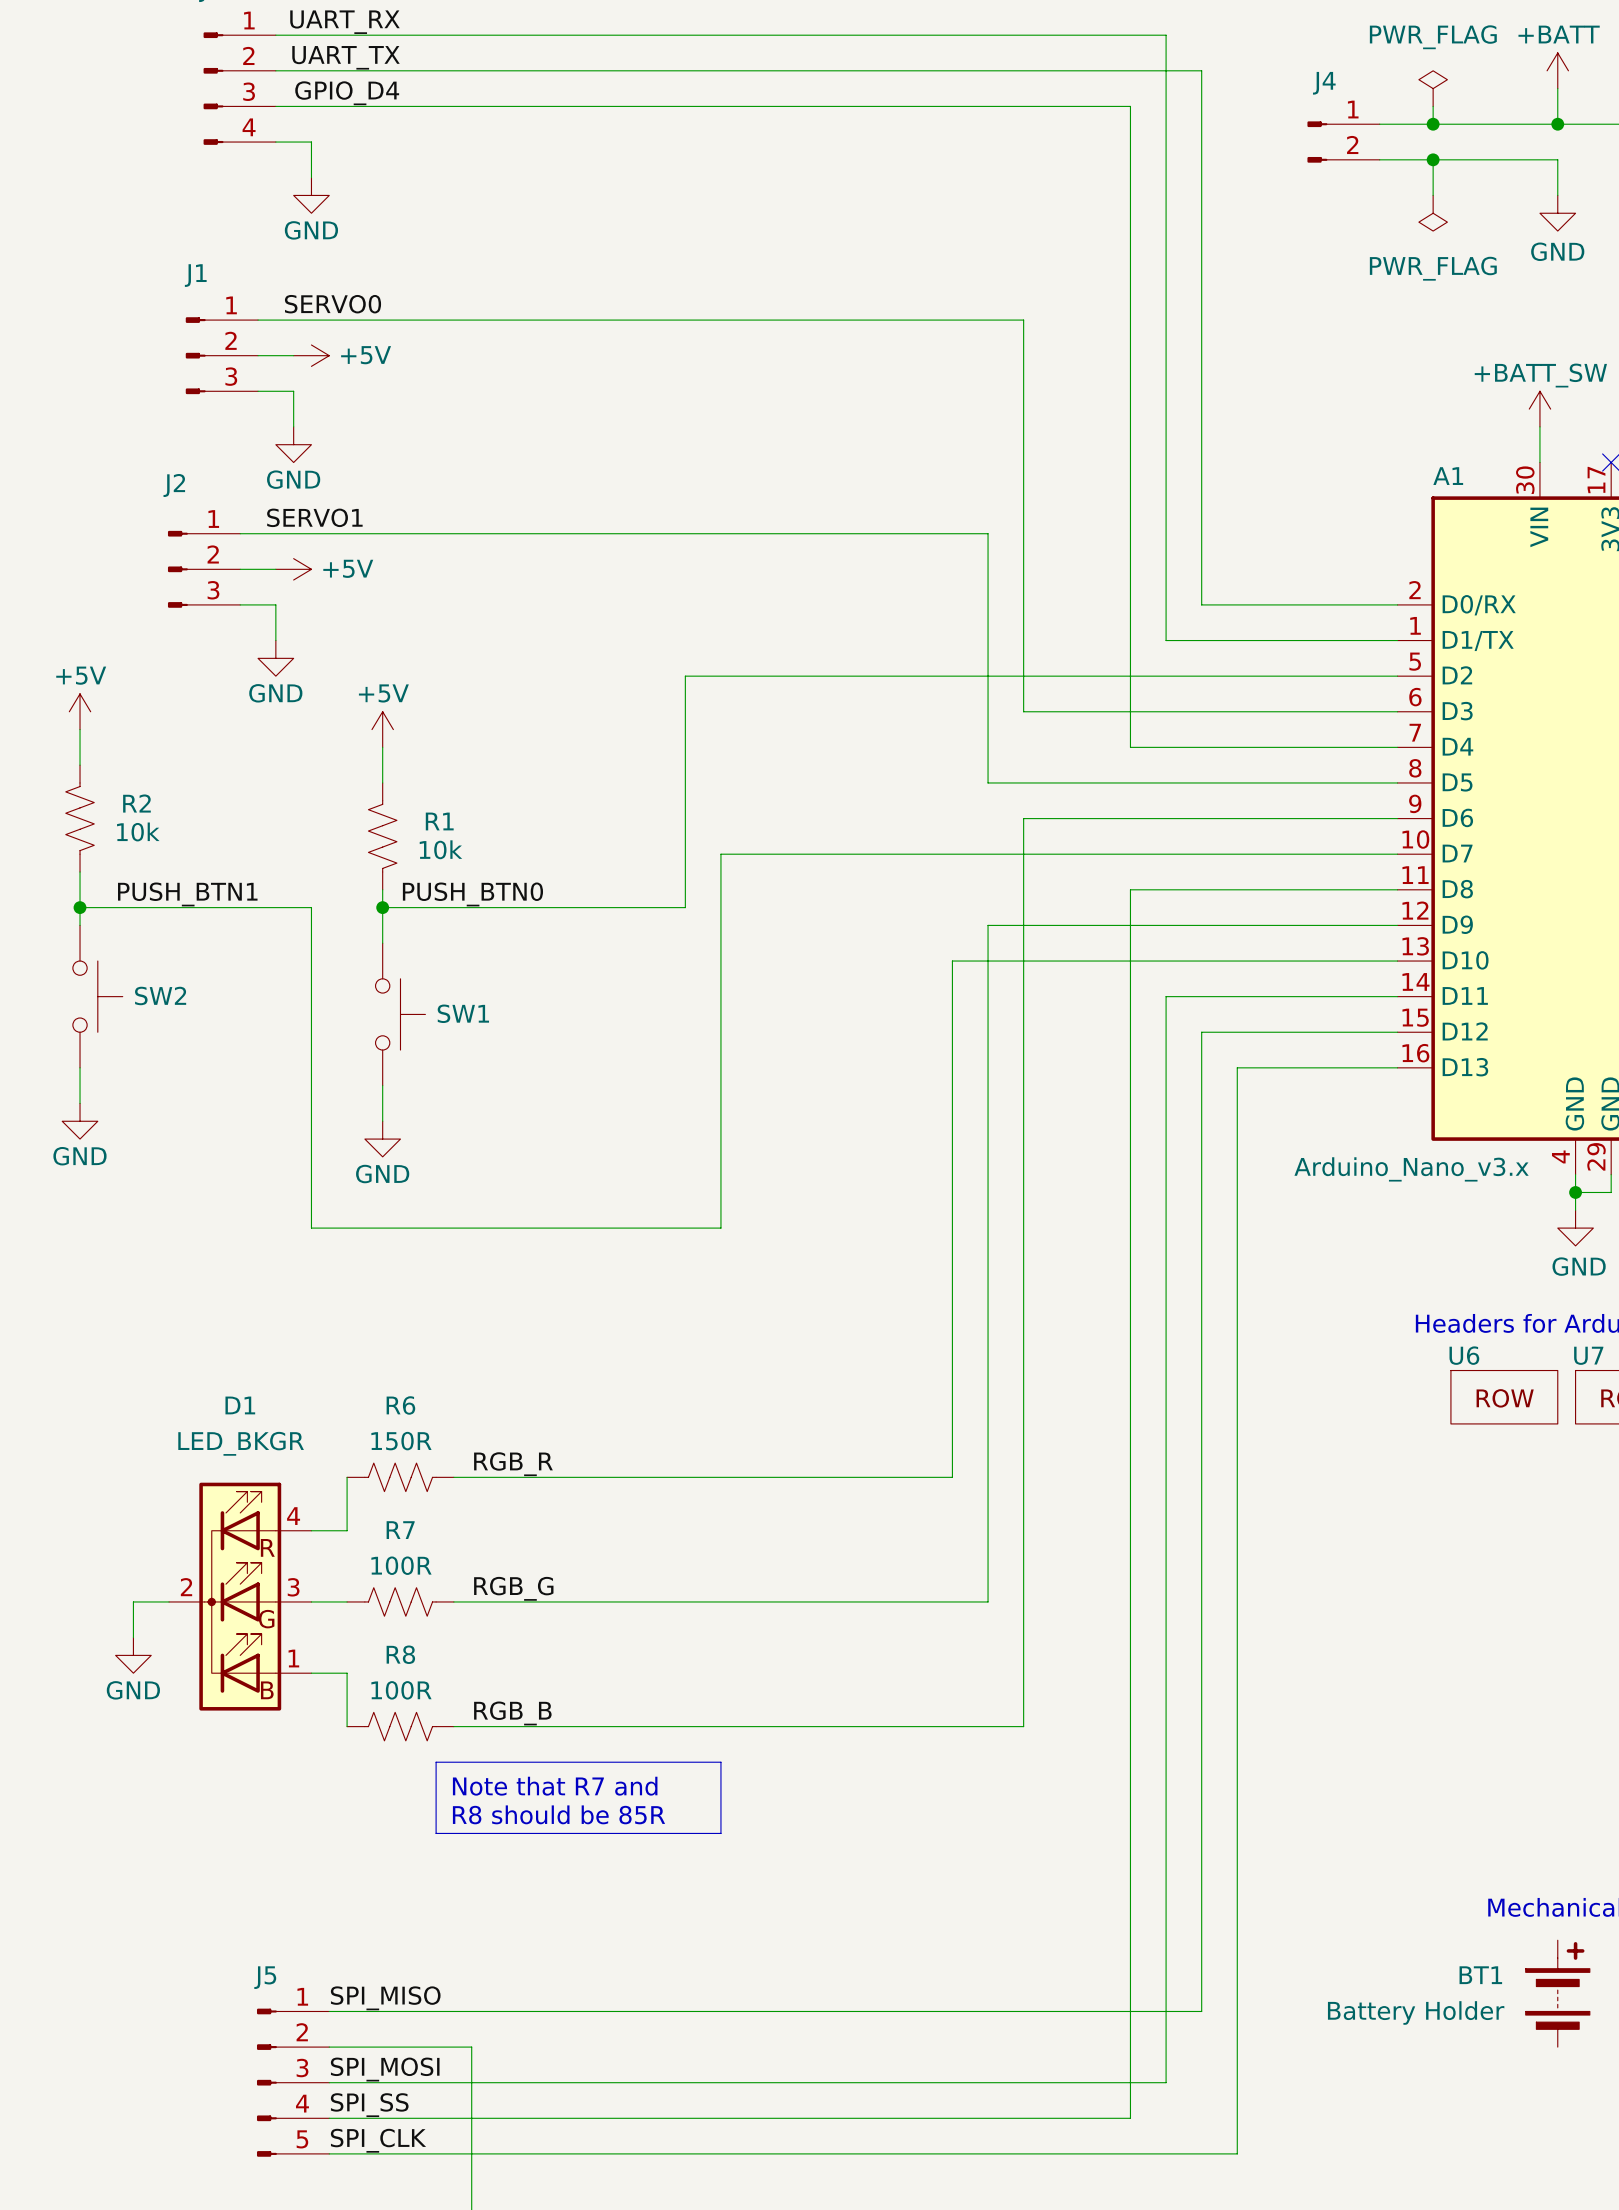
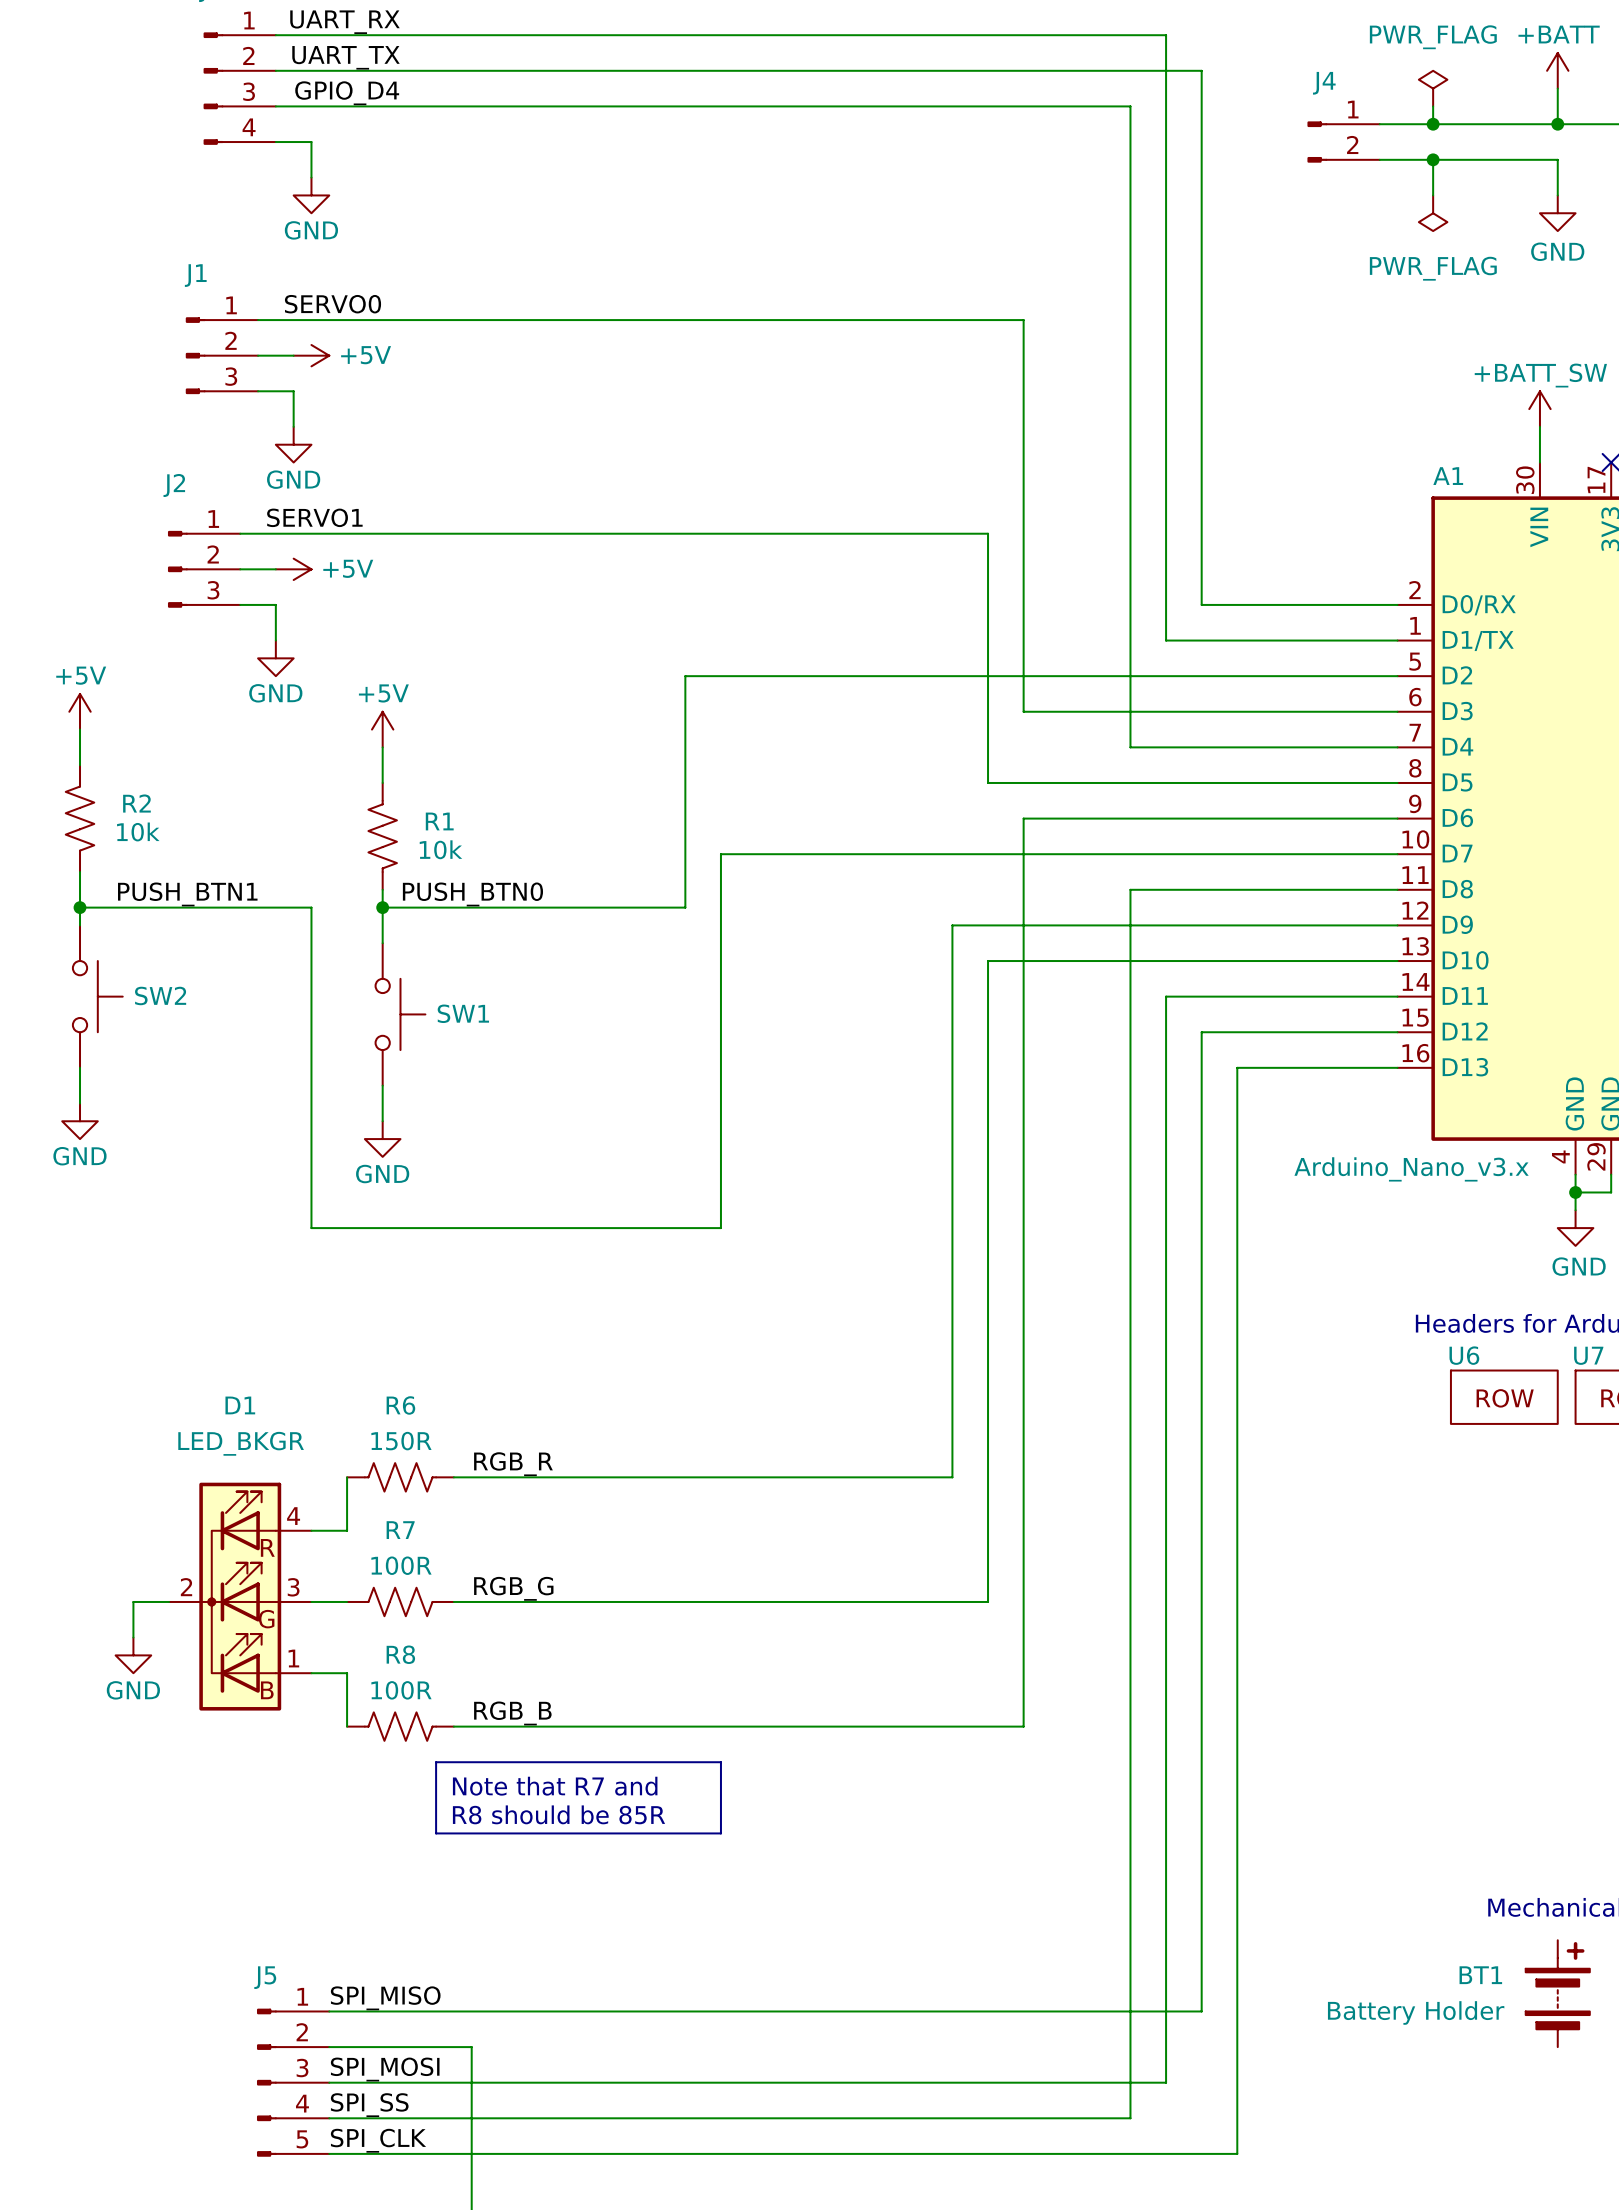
wire: (988, 925) (988, 961) (952, 961) -> (988, 925) (952, 925) (952, 961)

